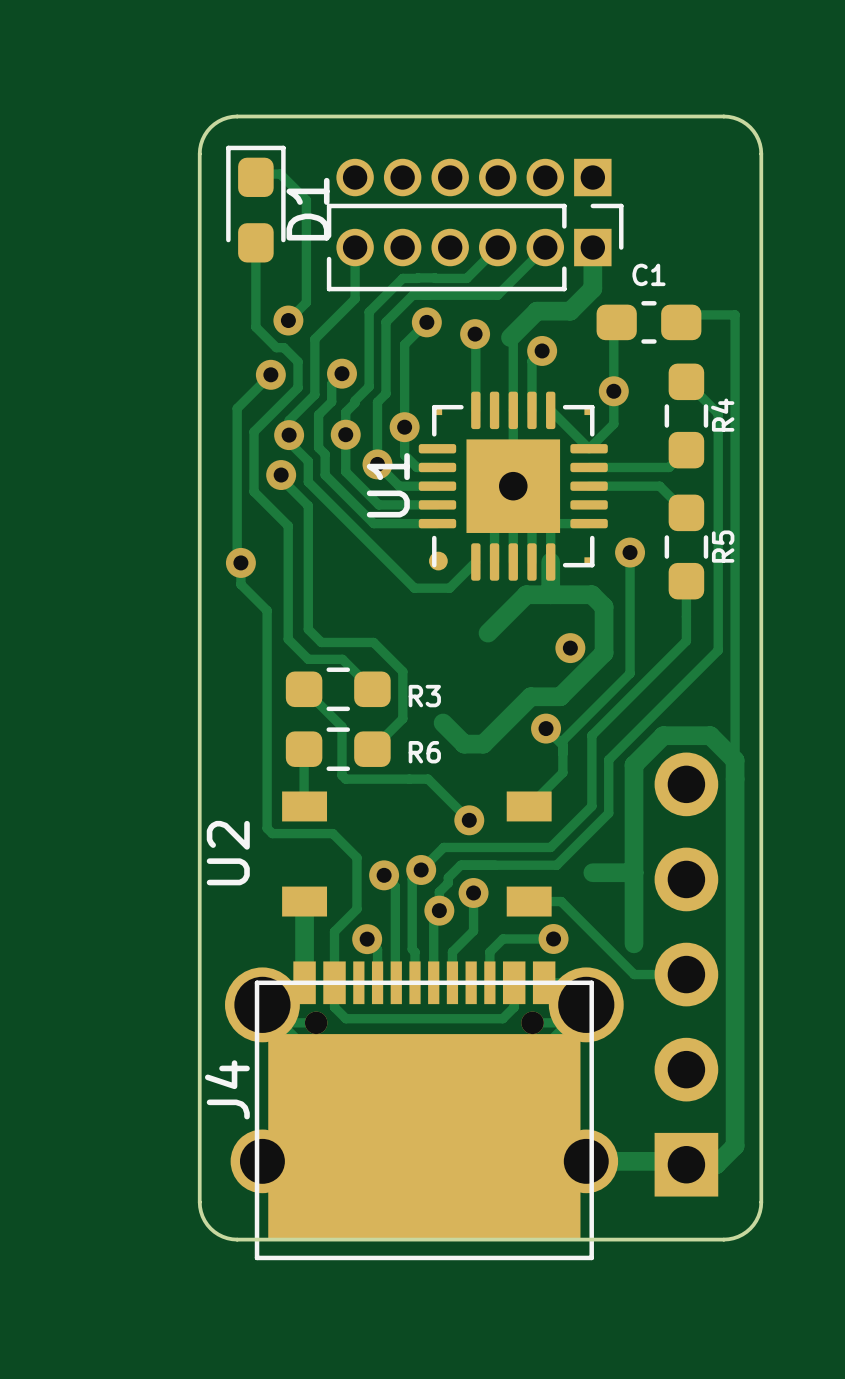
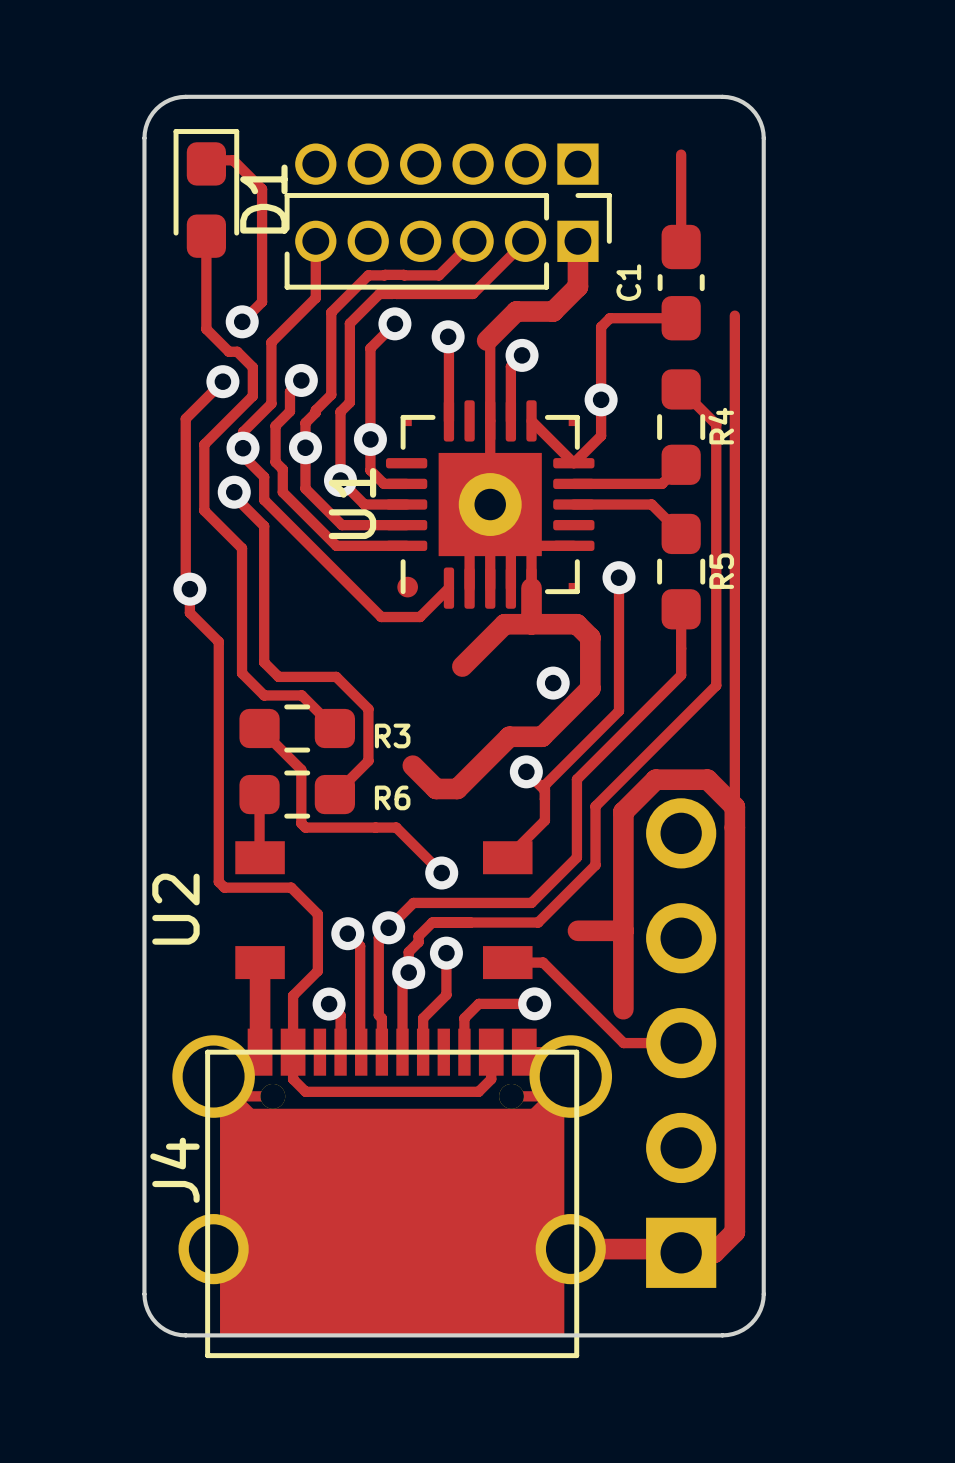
track: none -> (681, 154) (681, 247)
track: (693, 314) (735, 314) -> none
track: none -> (681, 318) (609, 318) (604, 323)
C1 rotation: 0° (648, 322) -> 90° clockwise (681, 282)

